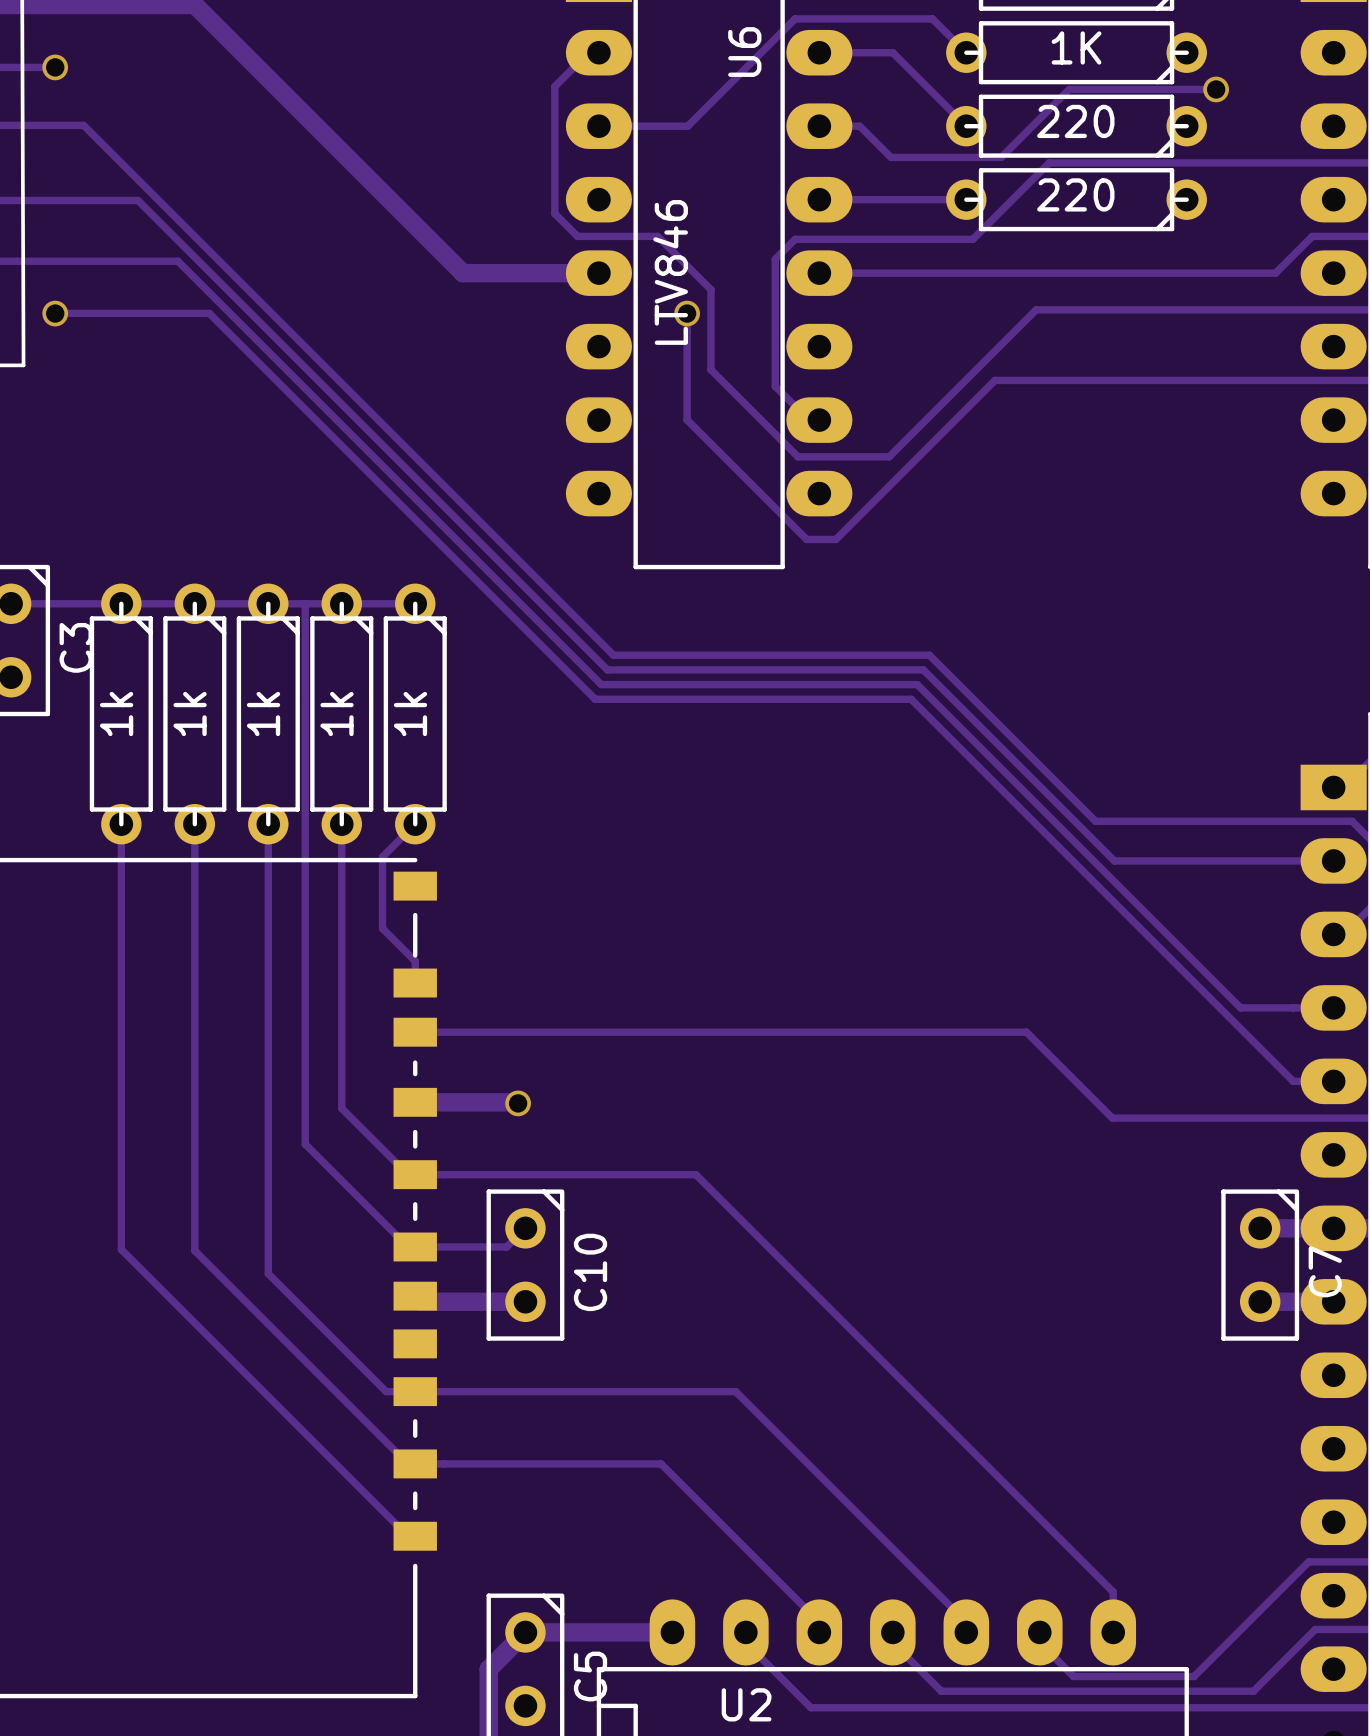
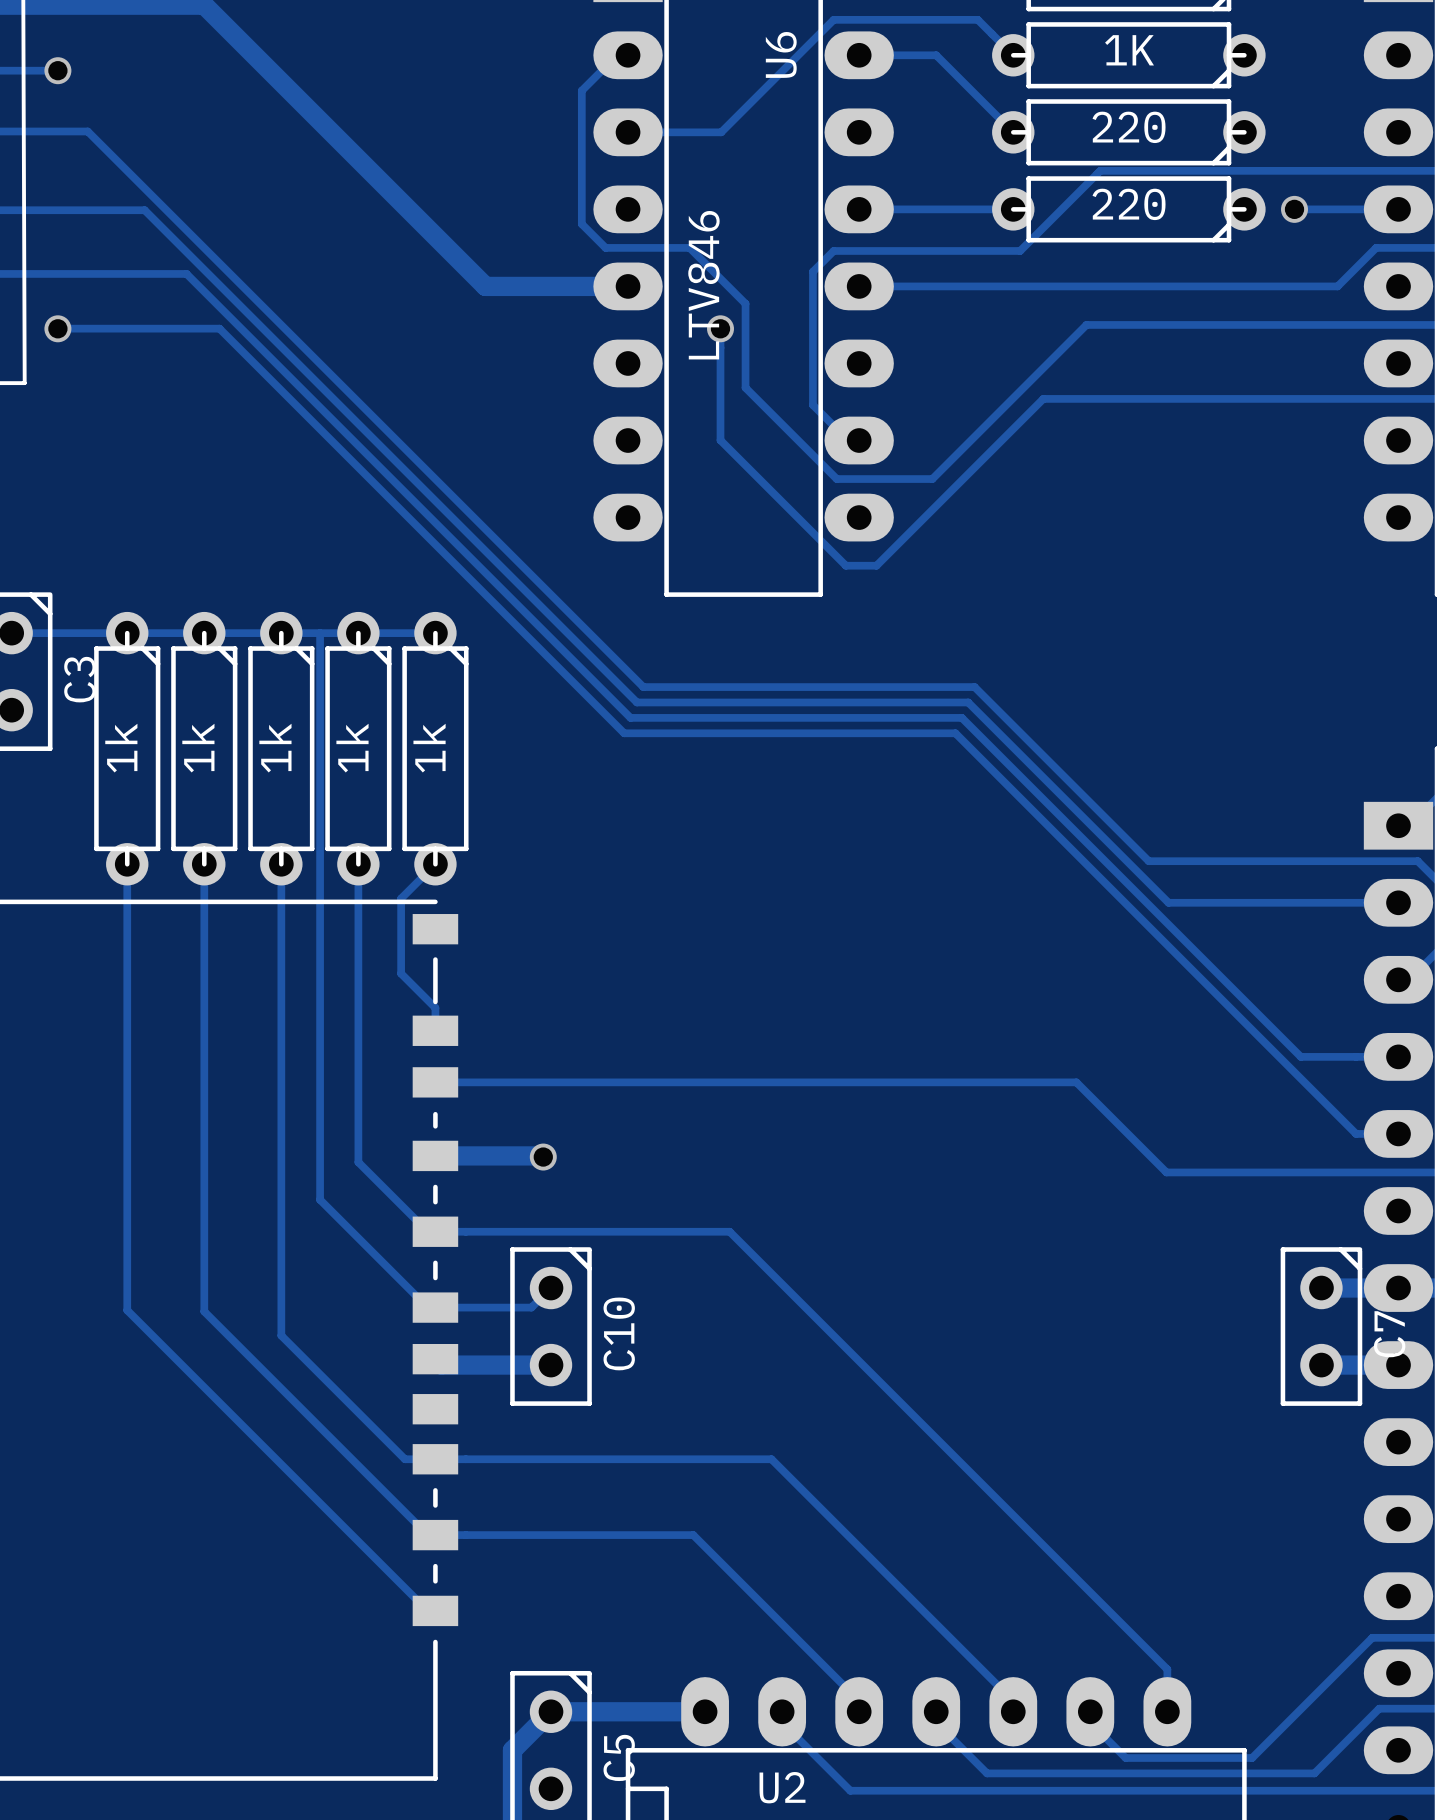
track: (1216, 89) (1069, 89) (1001, 157) (891, 157) (859, 126) (819, 126) -> none
via position: (1216, 89) -> (1294, 209)
track: none -> (1294, 209) (1398, 209)

